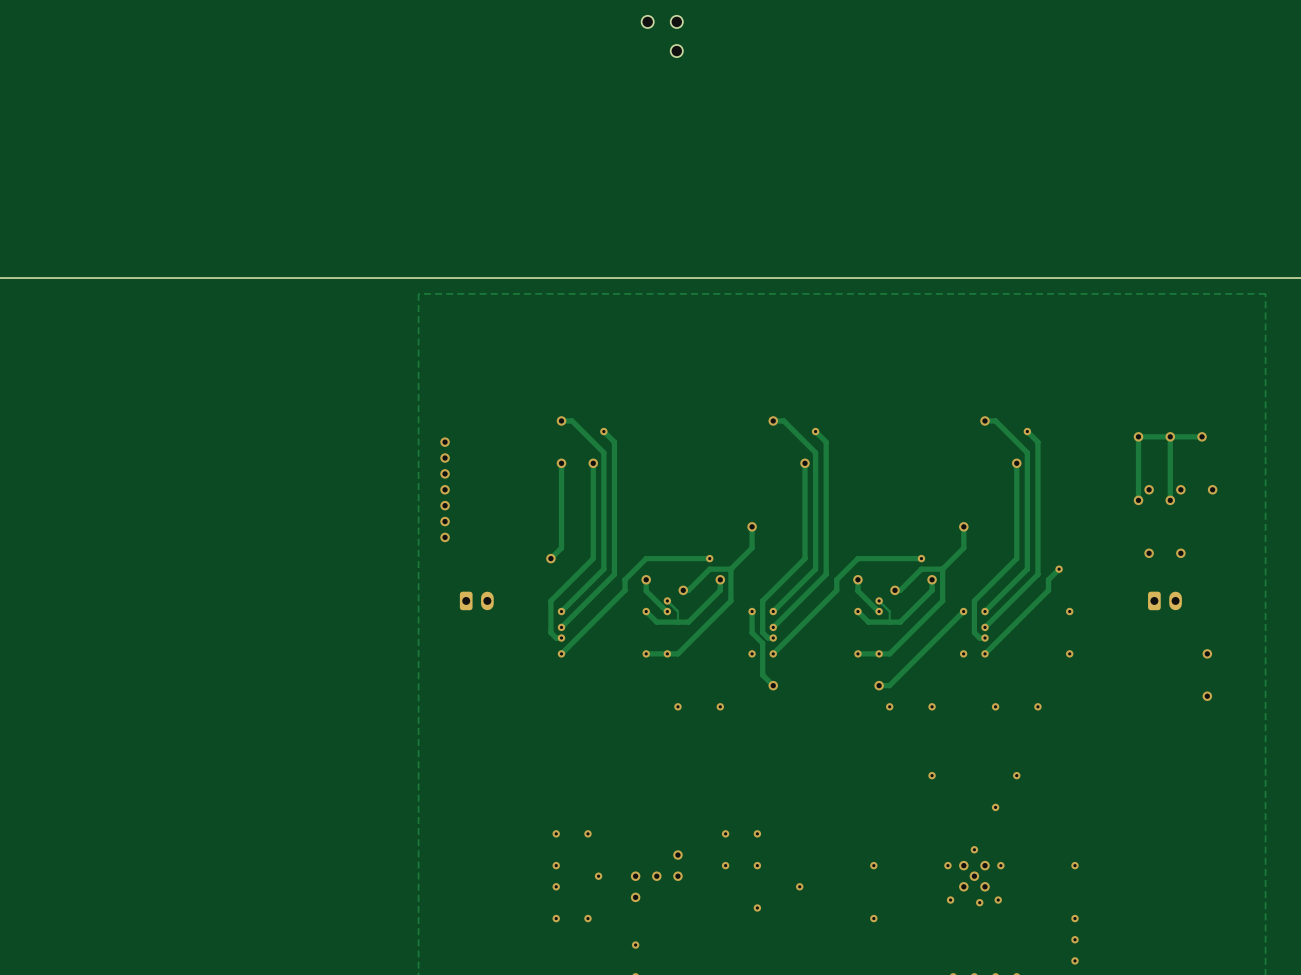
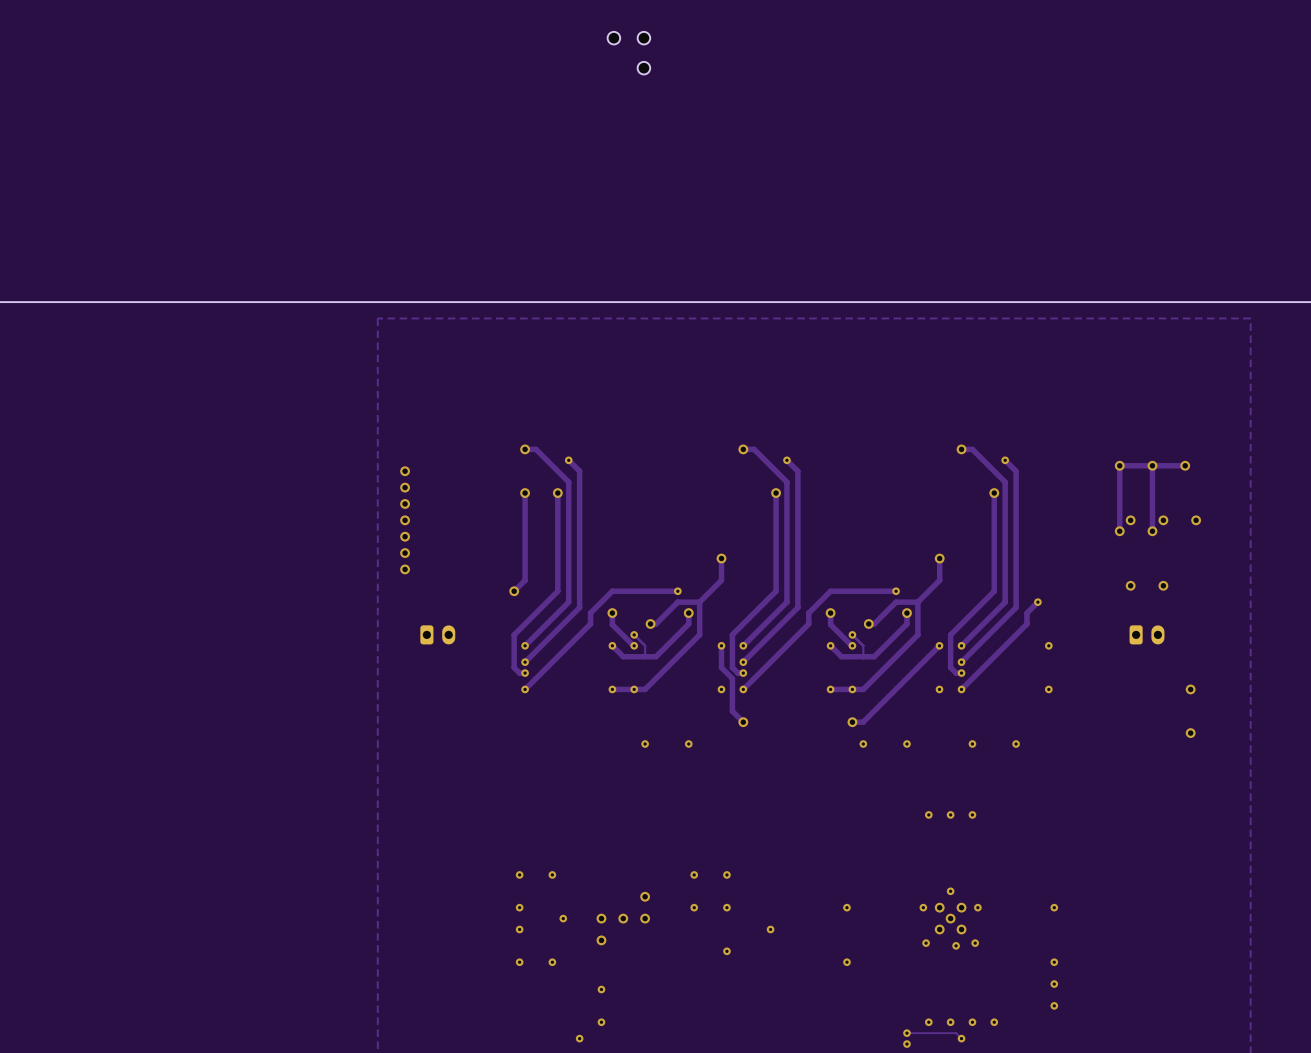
via: (932, 775) -> none
via: none -> (928, 814)
via: none -> (950, 814)
via: none -> (972, 814)
via: (1016, 775) -> none
via: (995, 807) -> none

